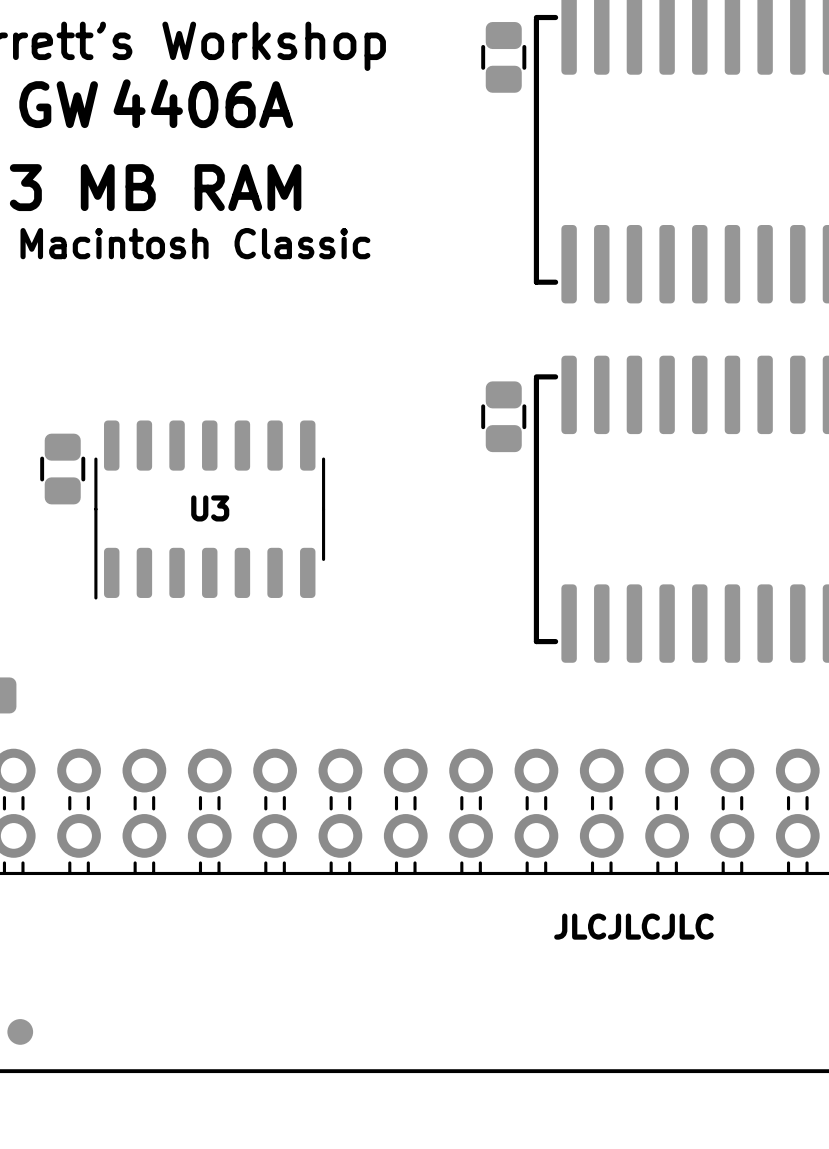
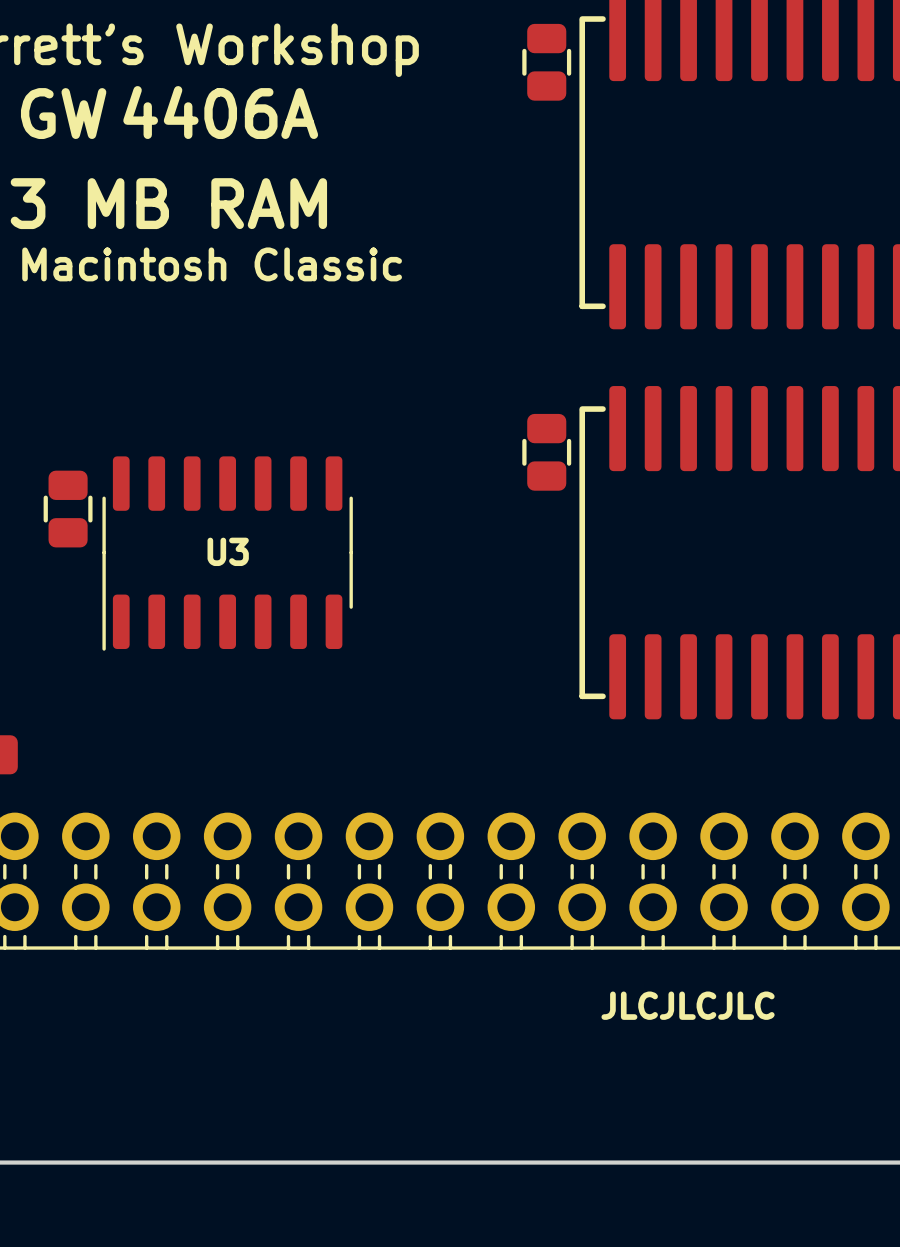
part: (20, 1031) -> none

